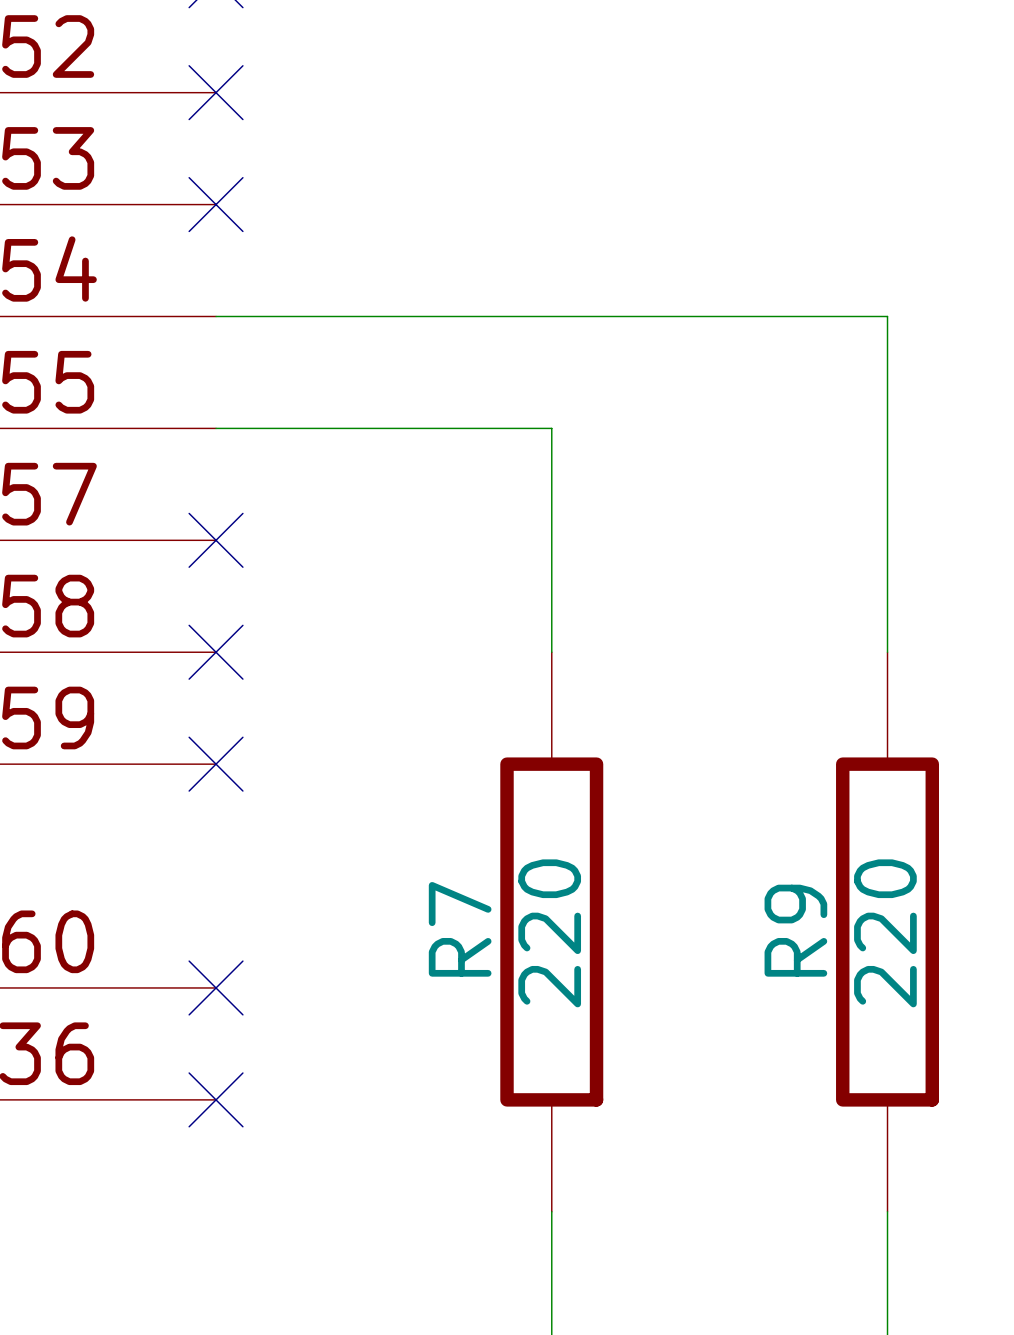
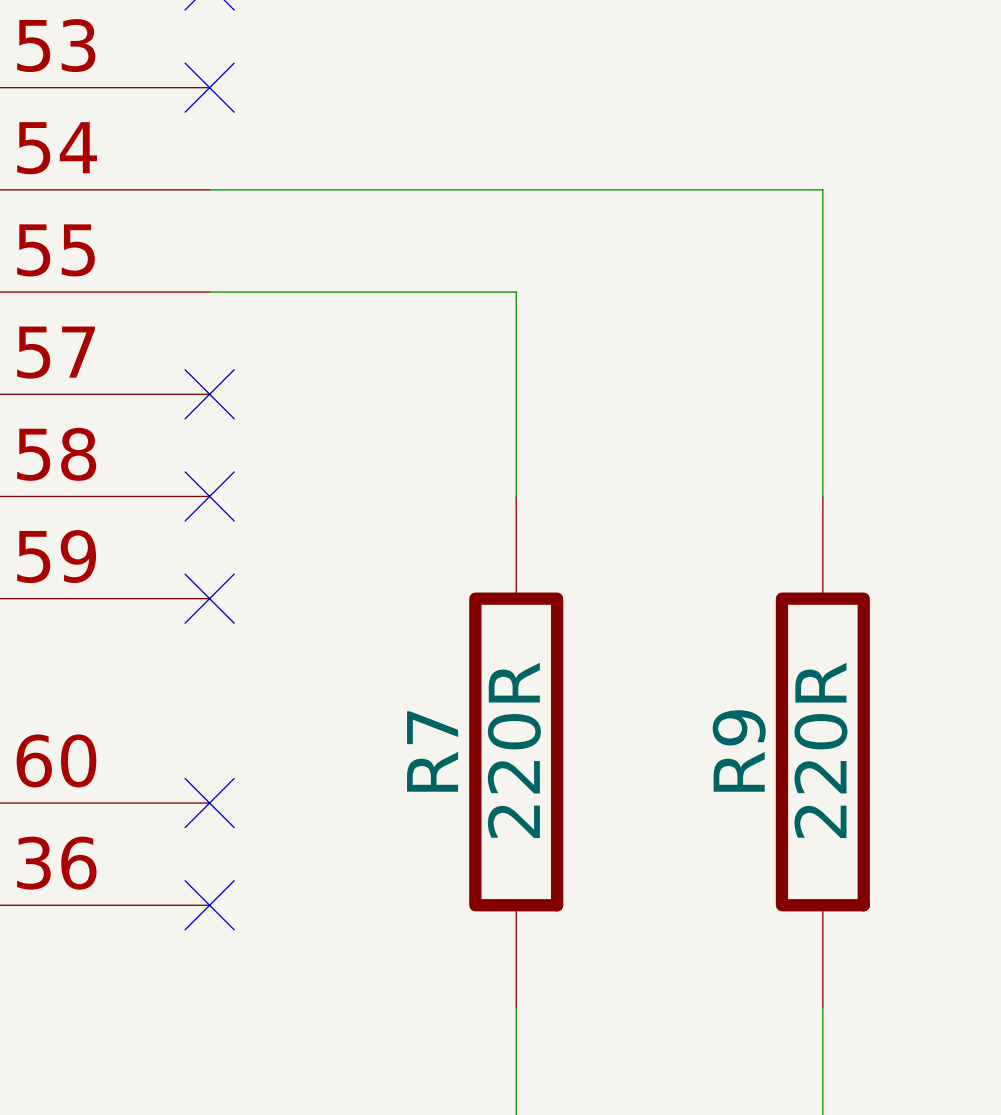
R7 value: 220 (549, 933) -> 220R (514, 750)
R9 value: 220 (885, 933) -> 220R (820, 750)

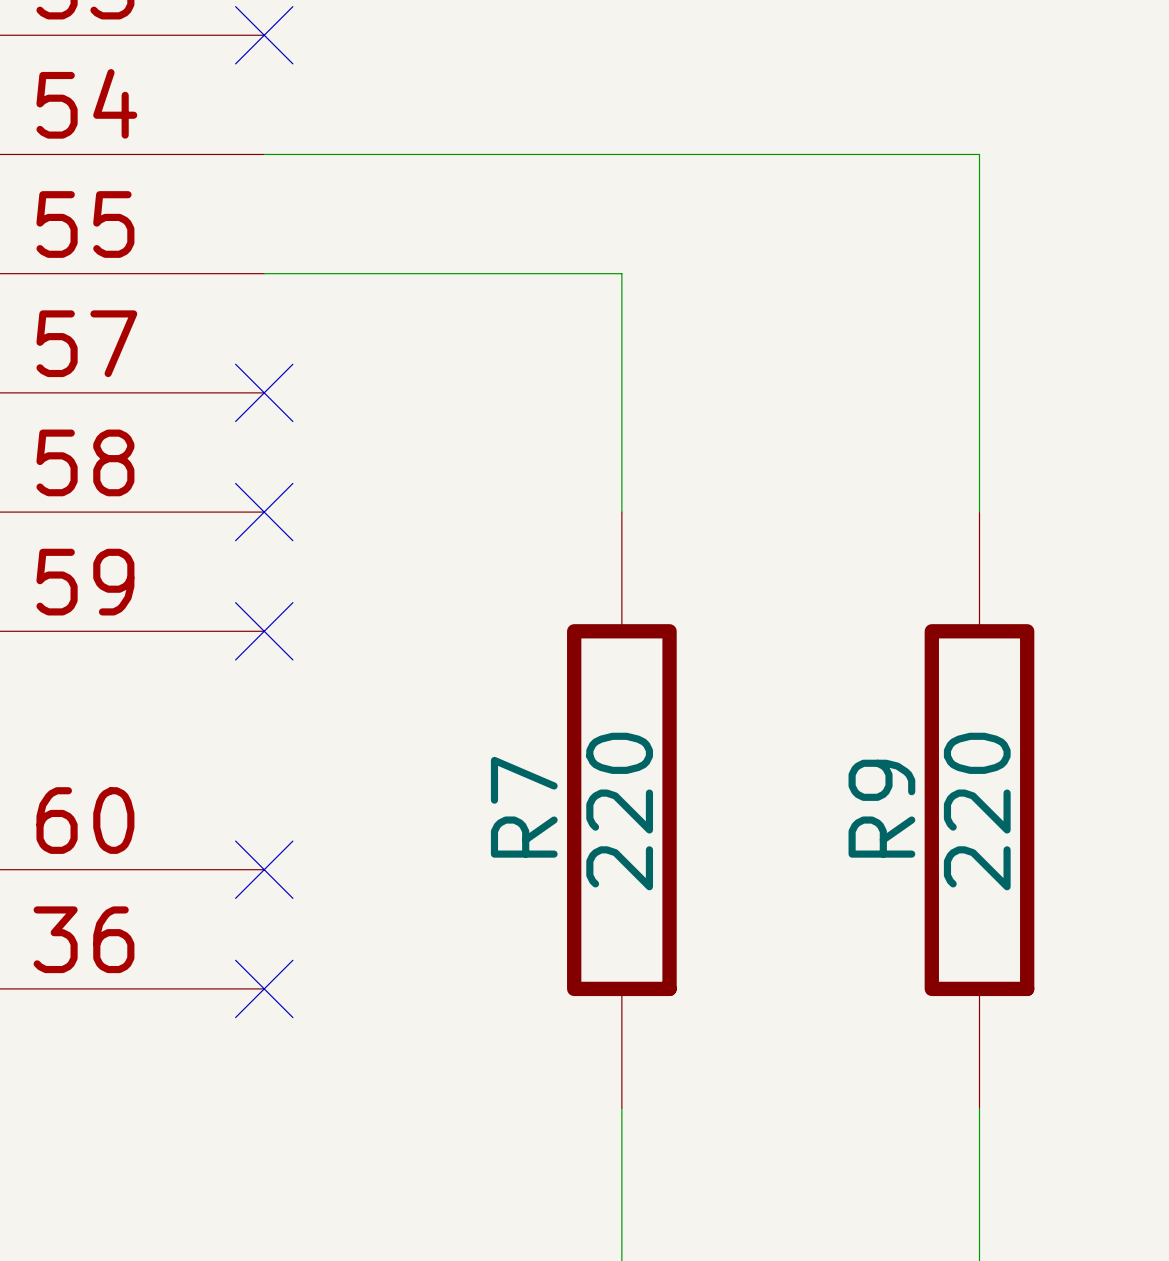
R7 value: 220R (514, 750) -> 220 (619, 811)
R9 value: 220R (820, 750) -> 220 (977, 811)

